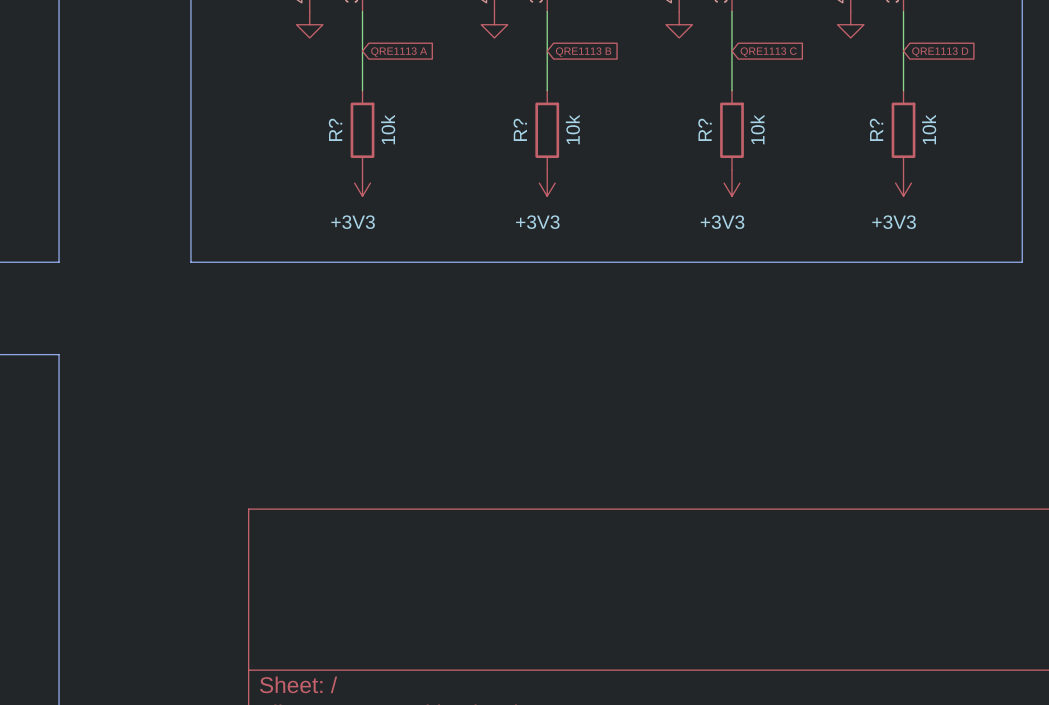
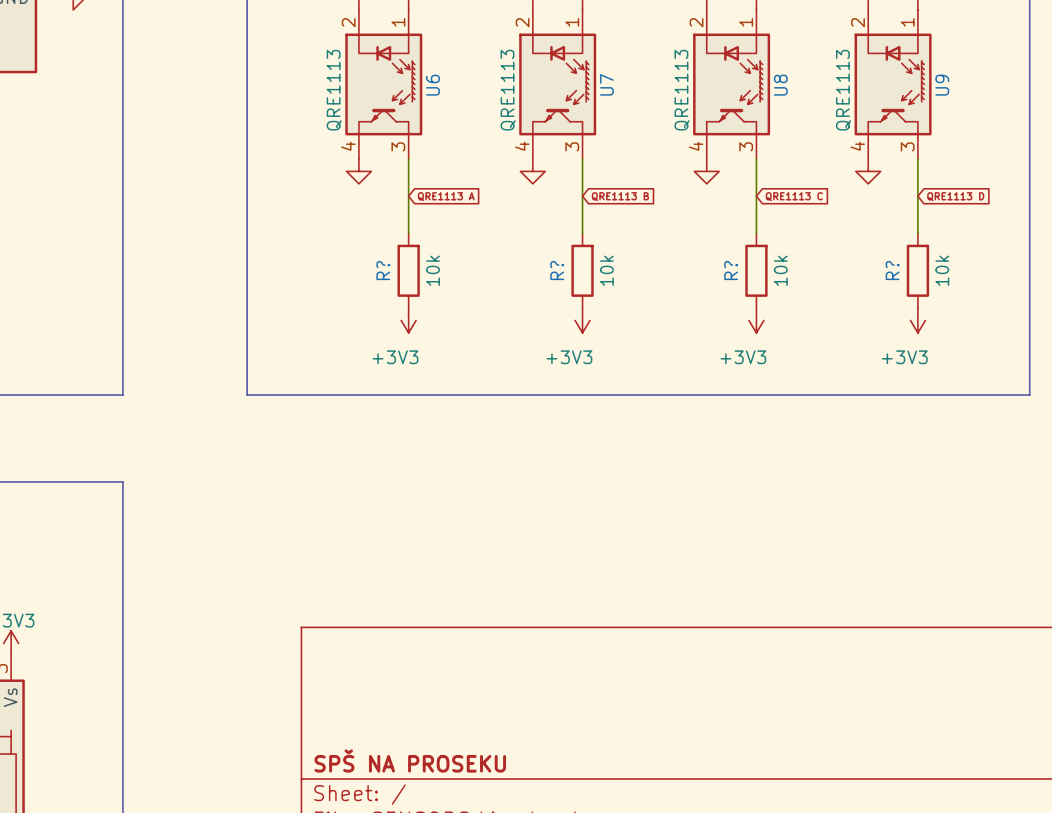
title block: none -> SPŠ NA PROSEKU (410, 760)

